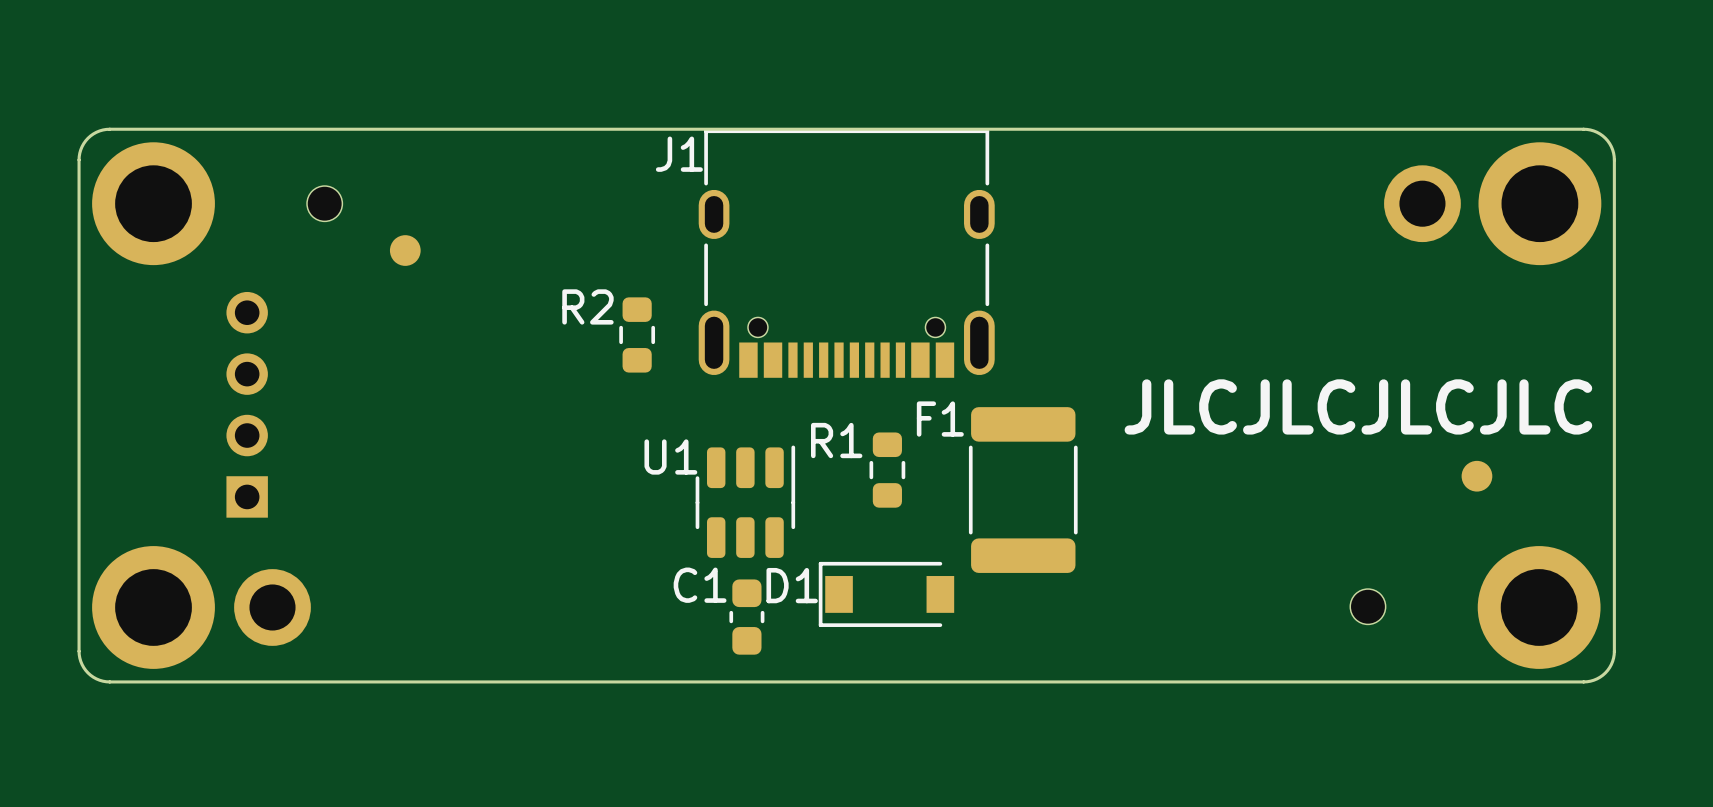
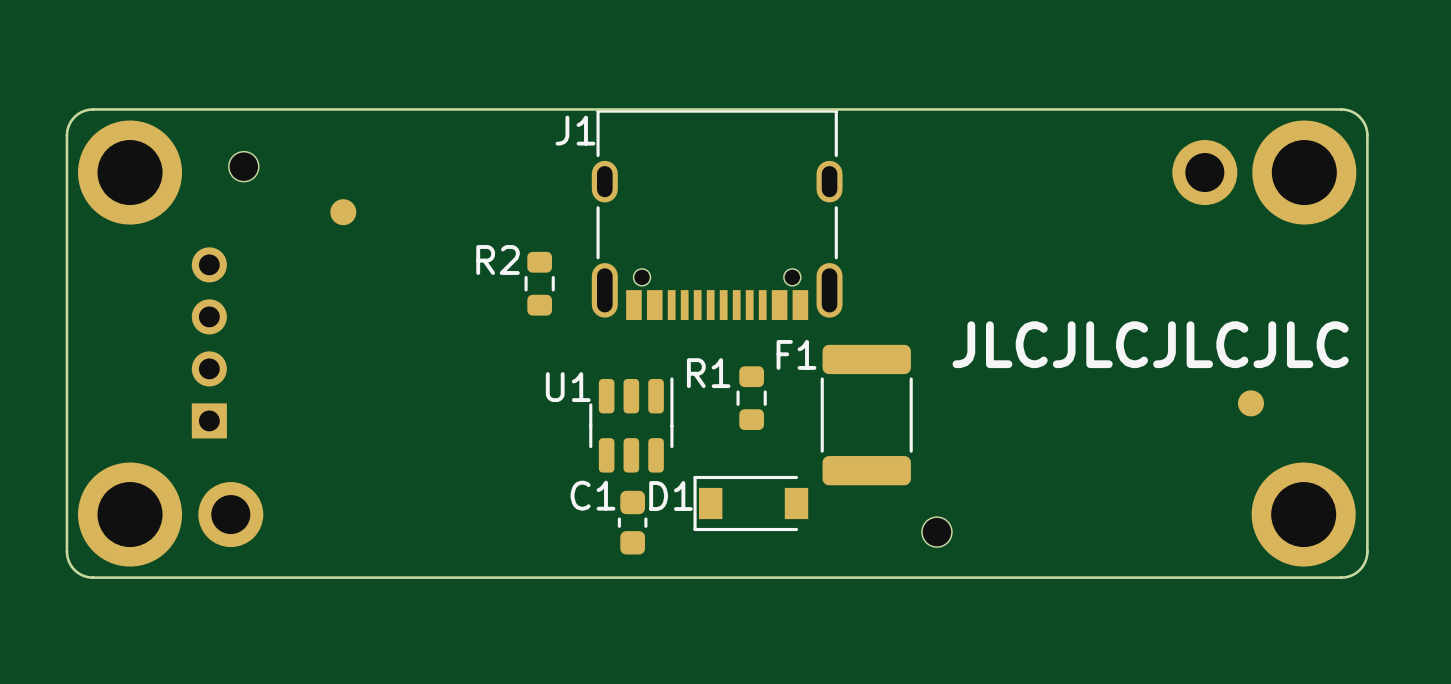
part position: (324, 203) -> (243, 166)
part position: (1367, 606) -> (936, 532)

